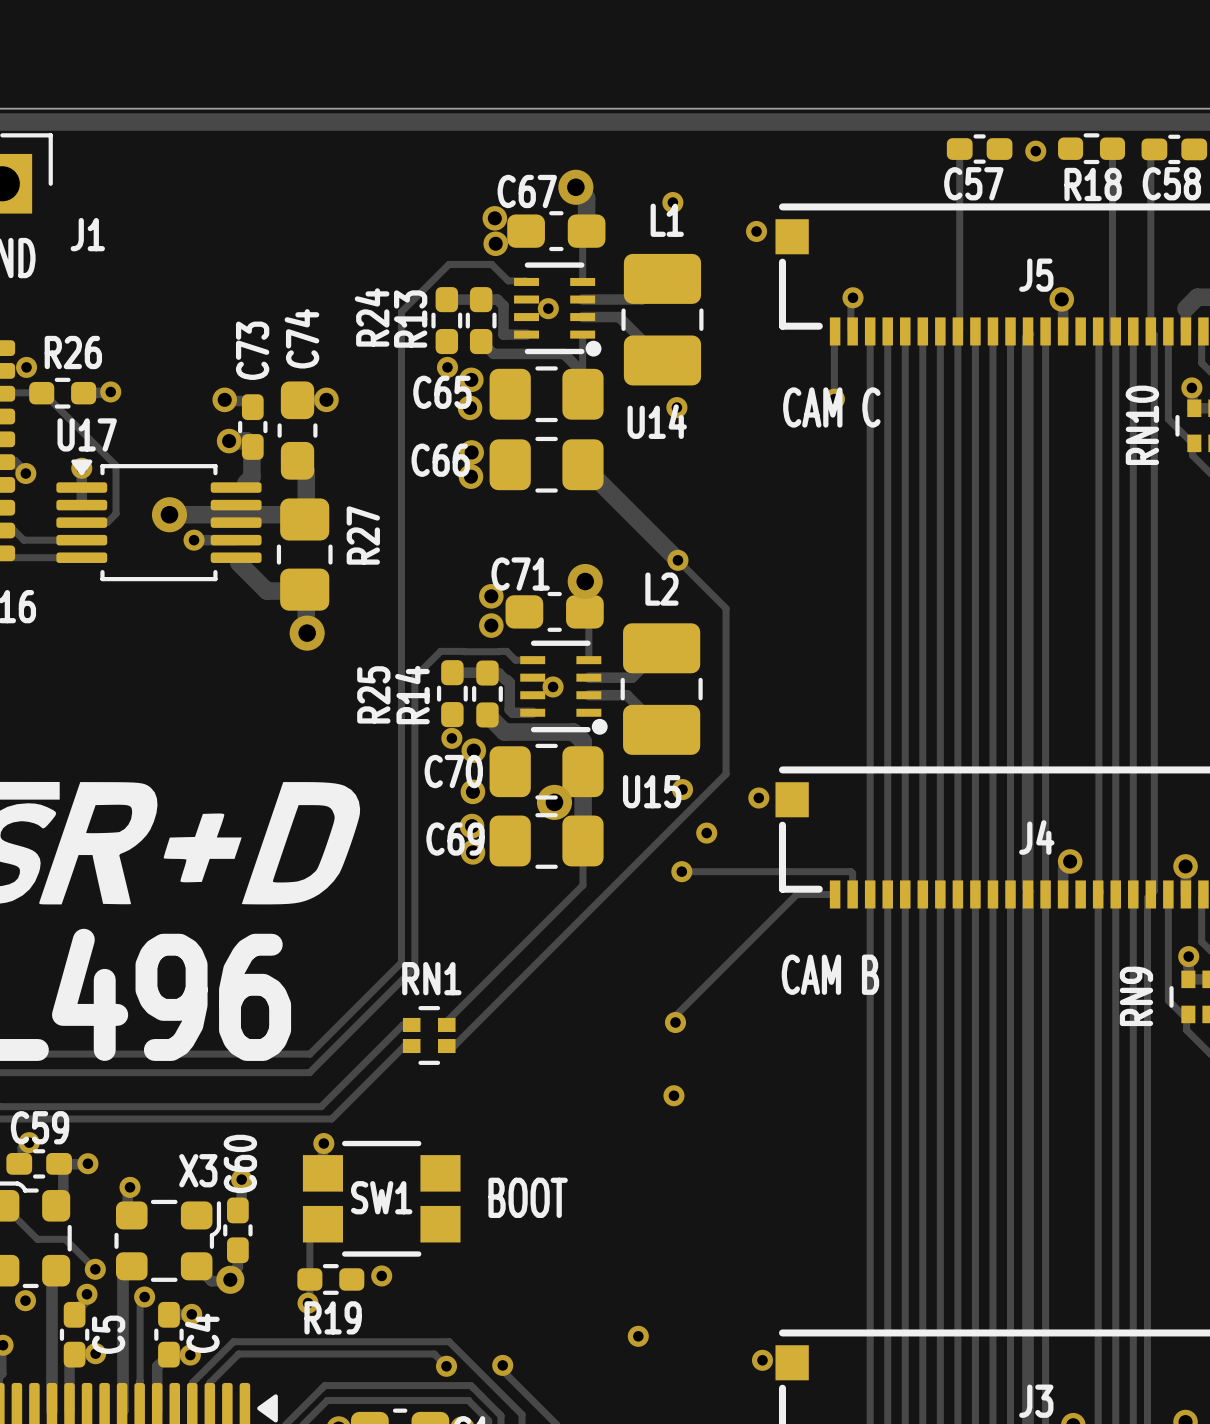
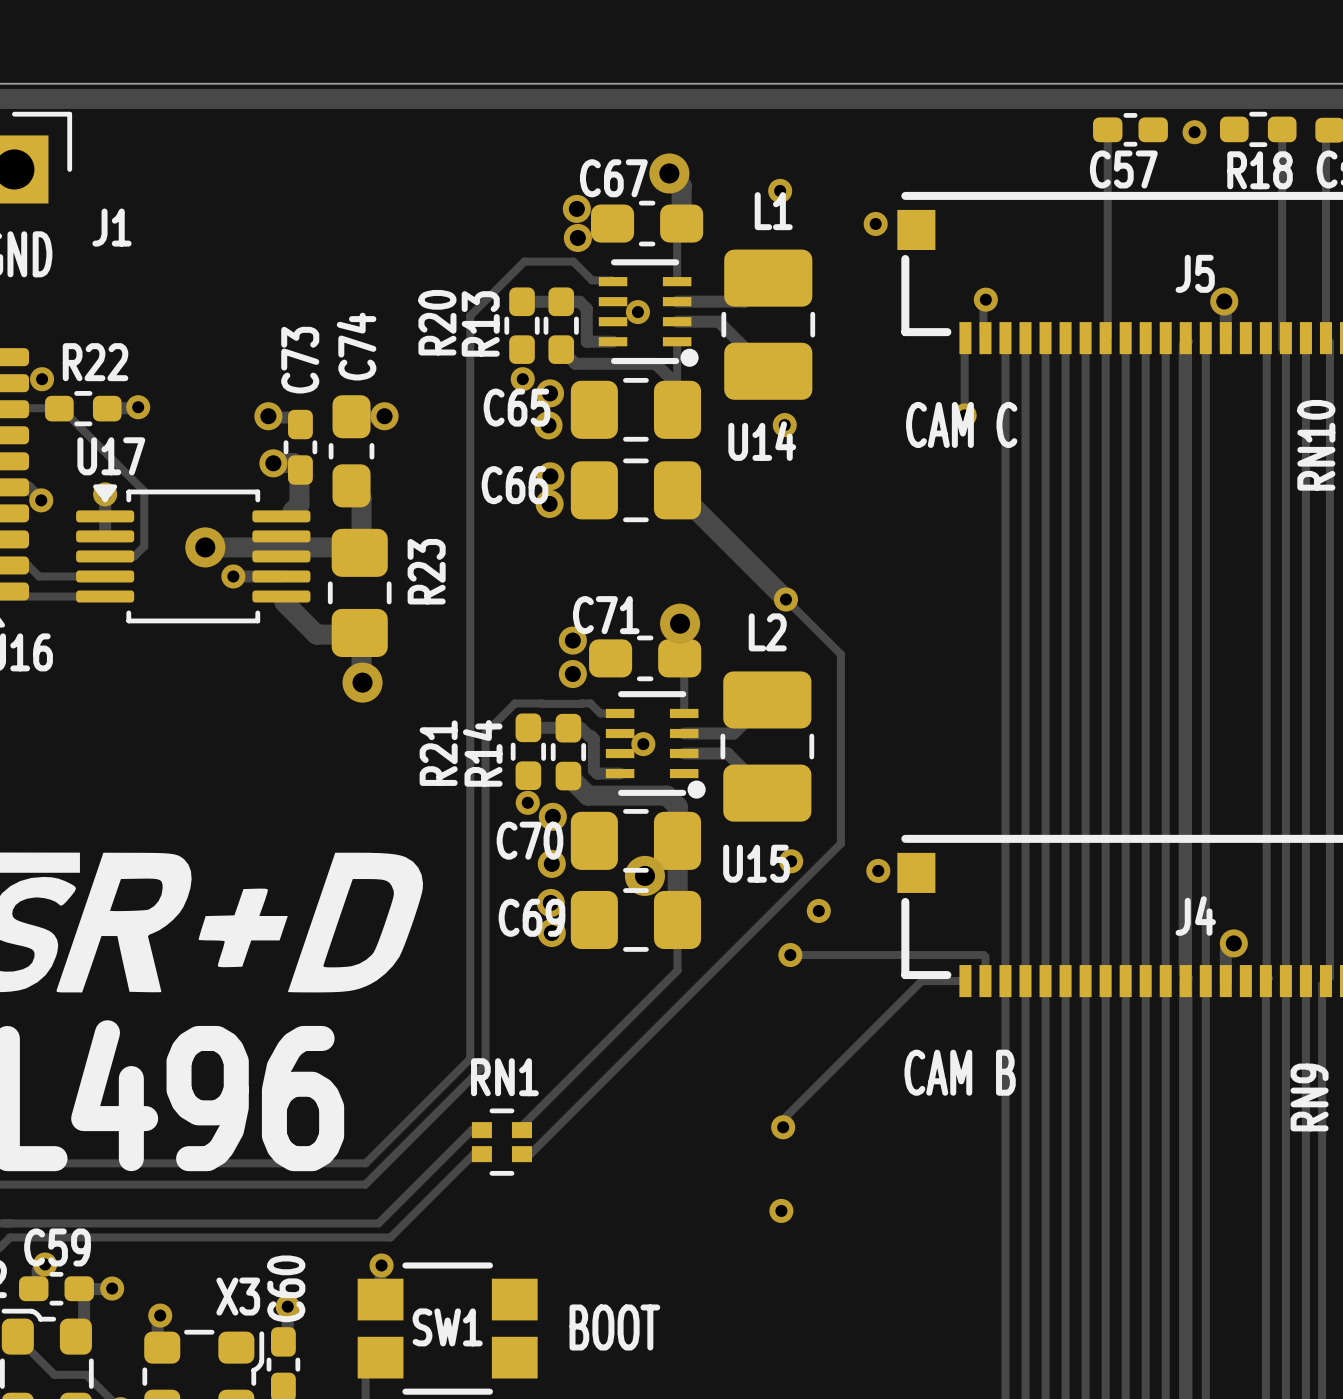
R24 name: R24 (372, 317) -> R20 (437, 322)
R26 name: R26 (73, 352) -> R22 (95, 362)
R27 name: R27 (363, 535) -> R23 (426, 571)
R25 name: R25 (373, 694) -> R21 (438, 753)

